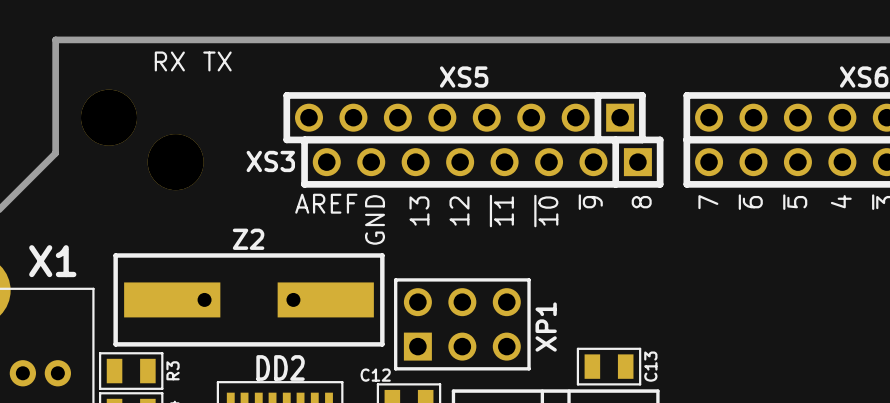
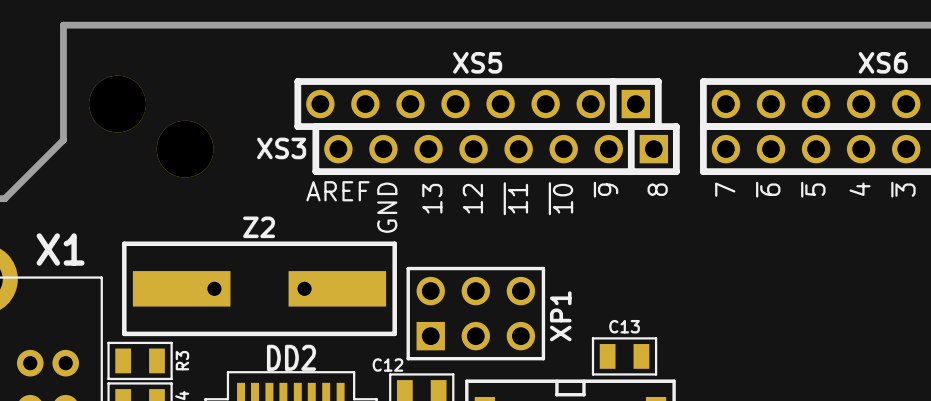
text: RX (169, 61) -> none
text: TX (217, 61) -> none
C13 name rotation: 0° (650, 366) -> 90° clockwise (624, 326)
C13 name position: C13 (650, 366) -> C13 (624, 326)

